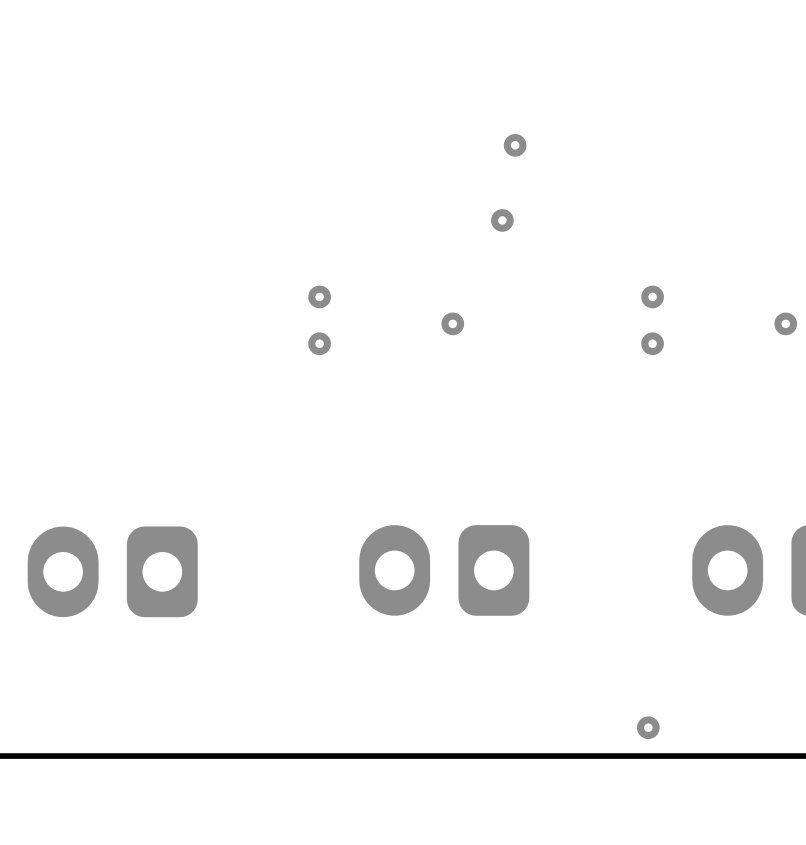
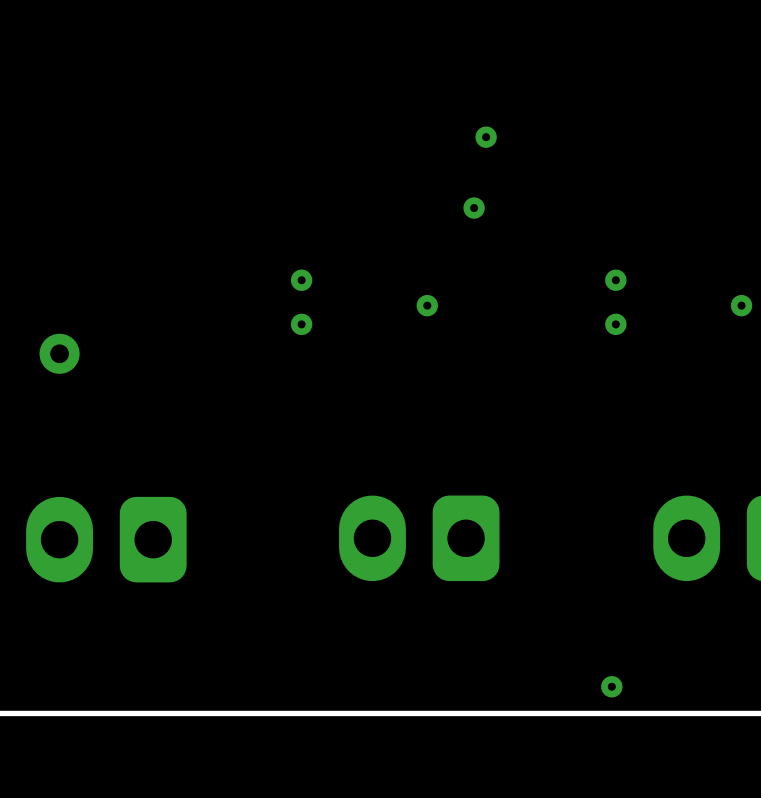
part: none -> (59, 353)

